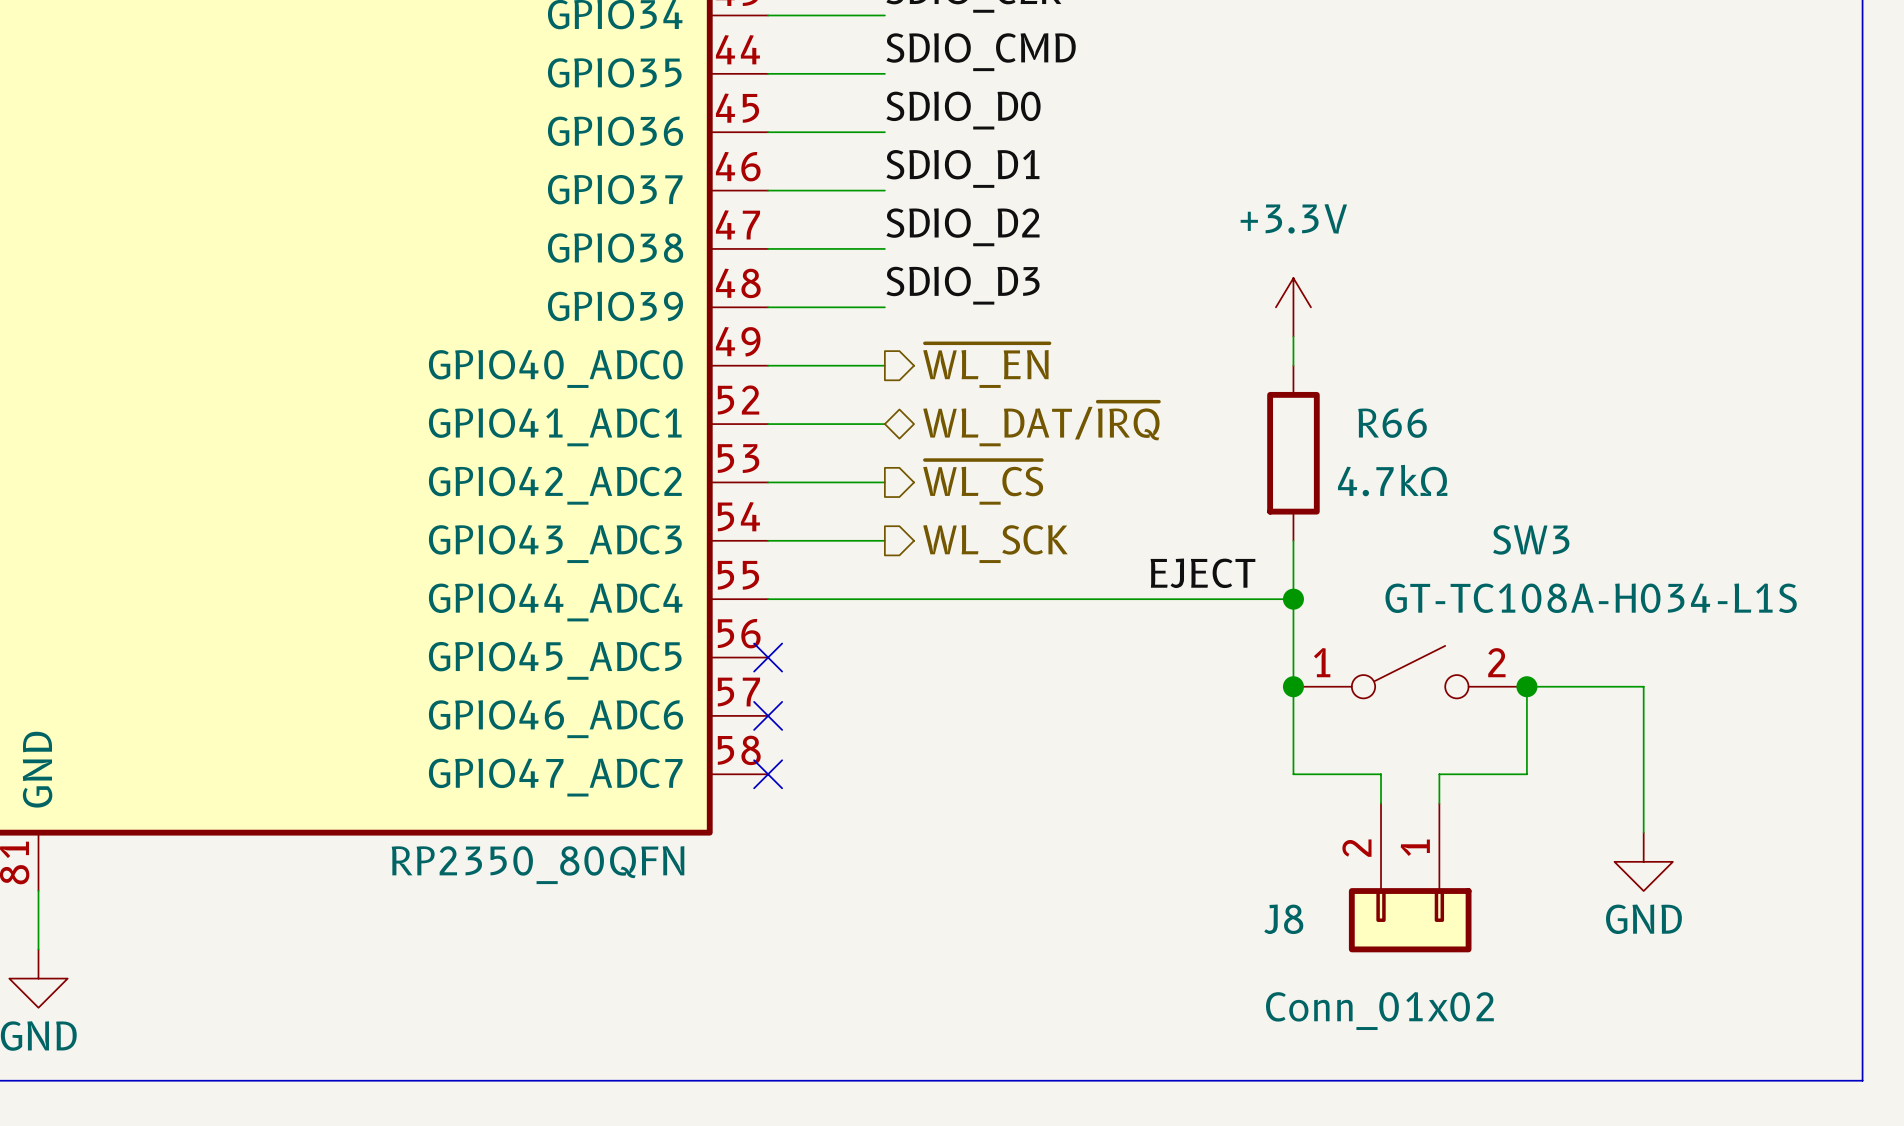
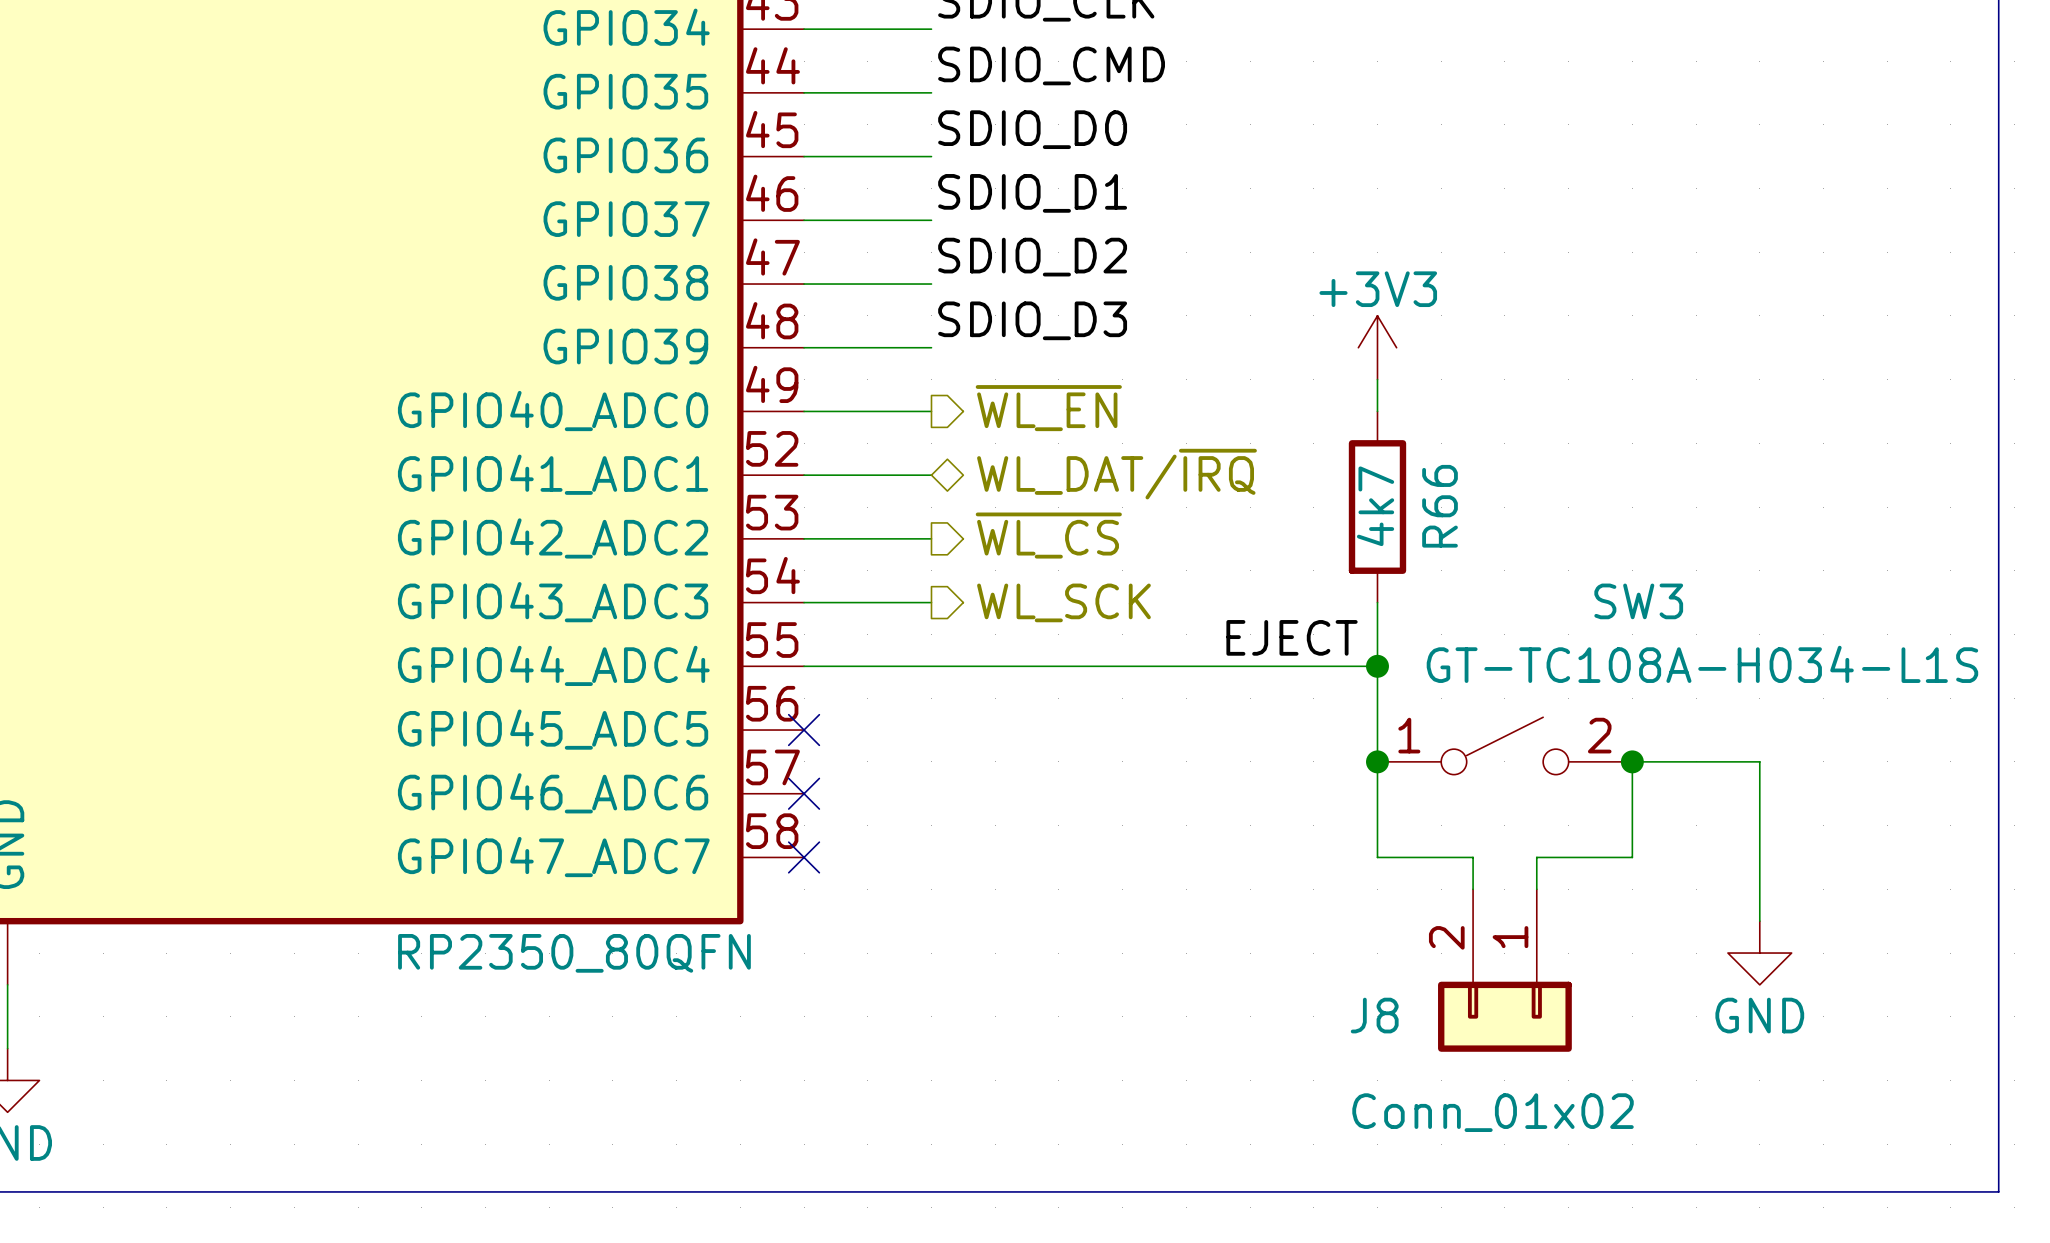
power symbol: +3.3V (1293, 307) -> +3V3 (1377, 347)
R66 name rotation: 0° (1392, 423) -> 90° counterclockwise (1440, 506)
R66 value: 4.7kΩ (1392, 480) -> 4k7 (1375, 506)

